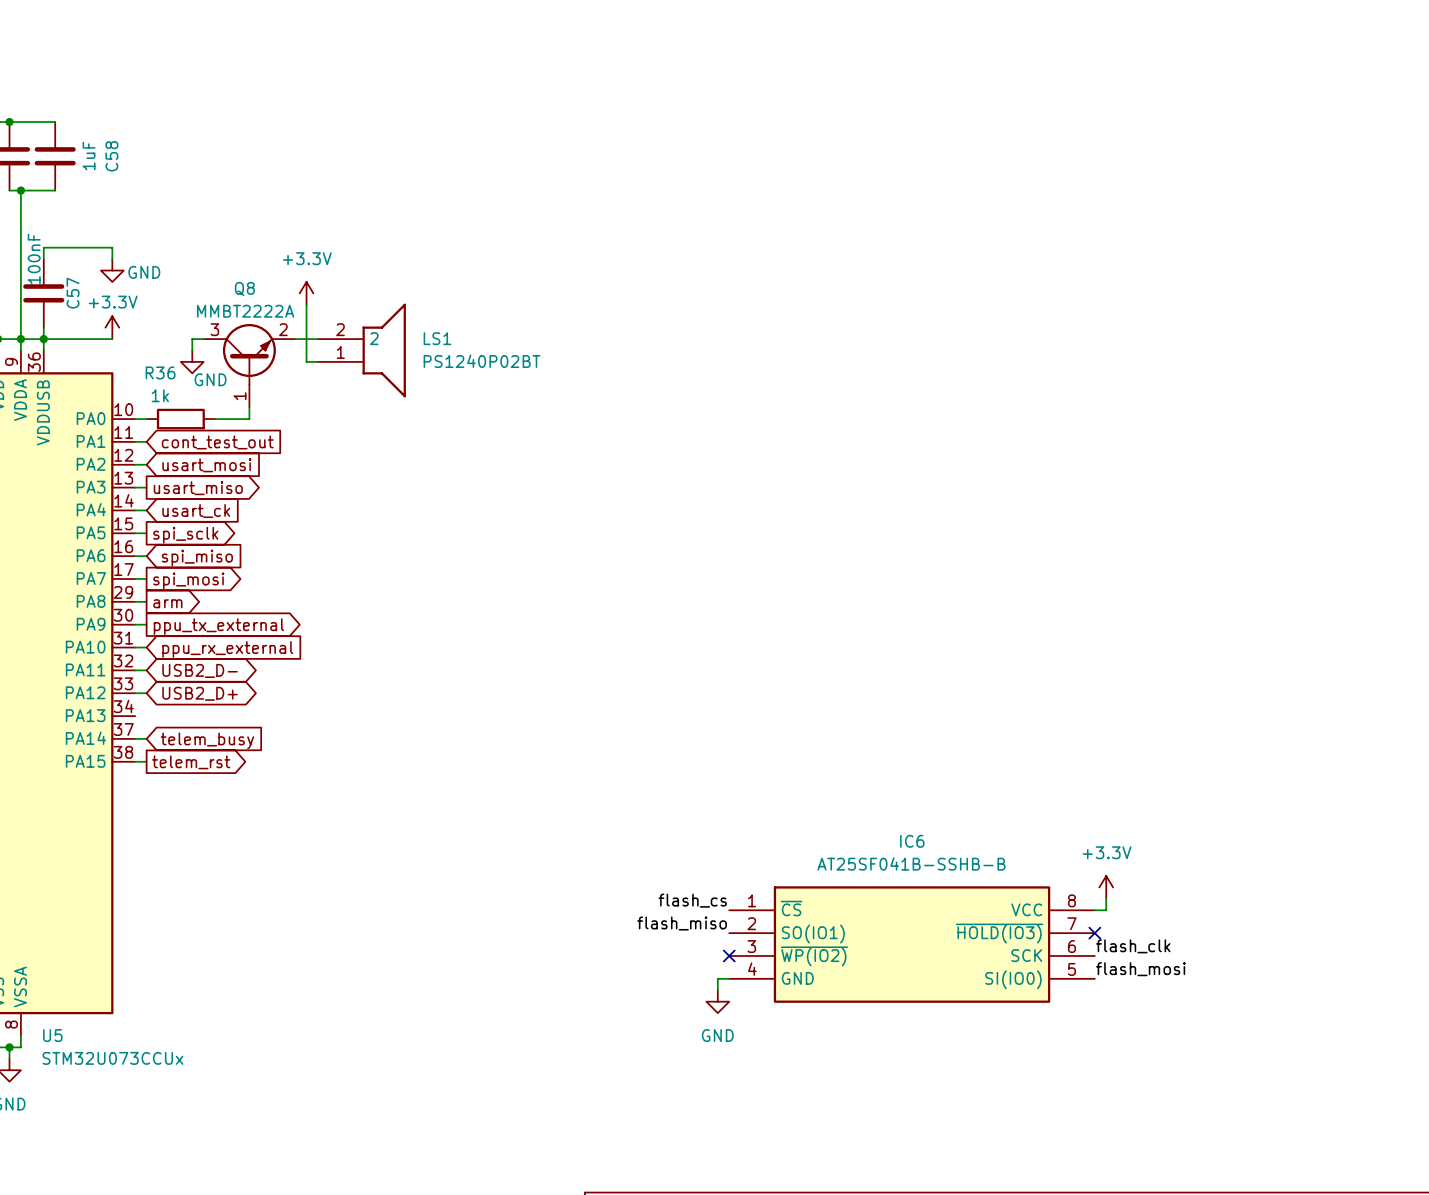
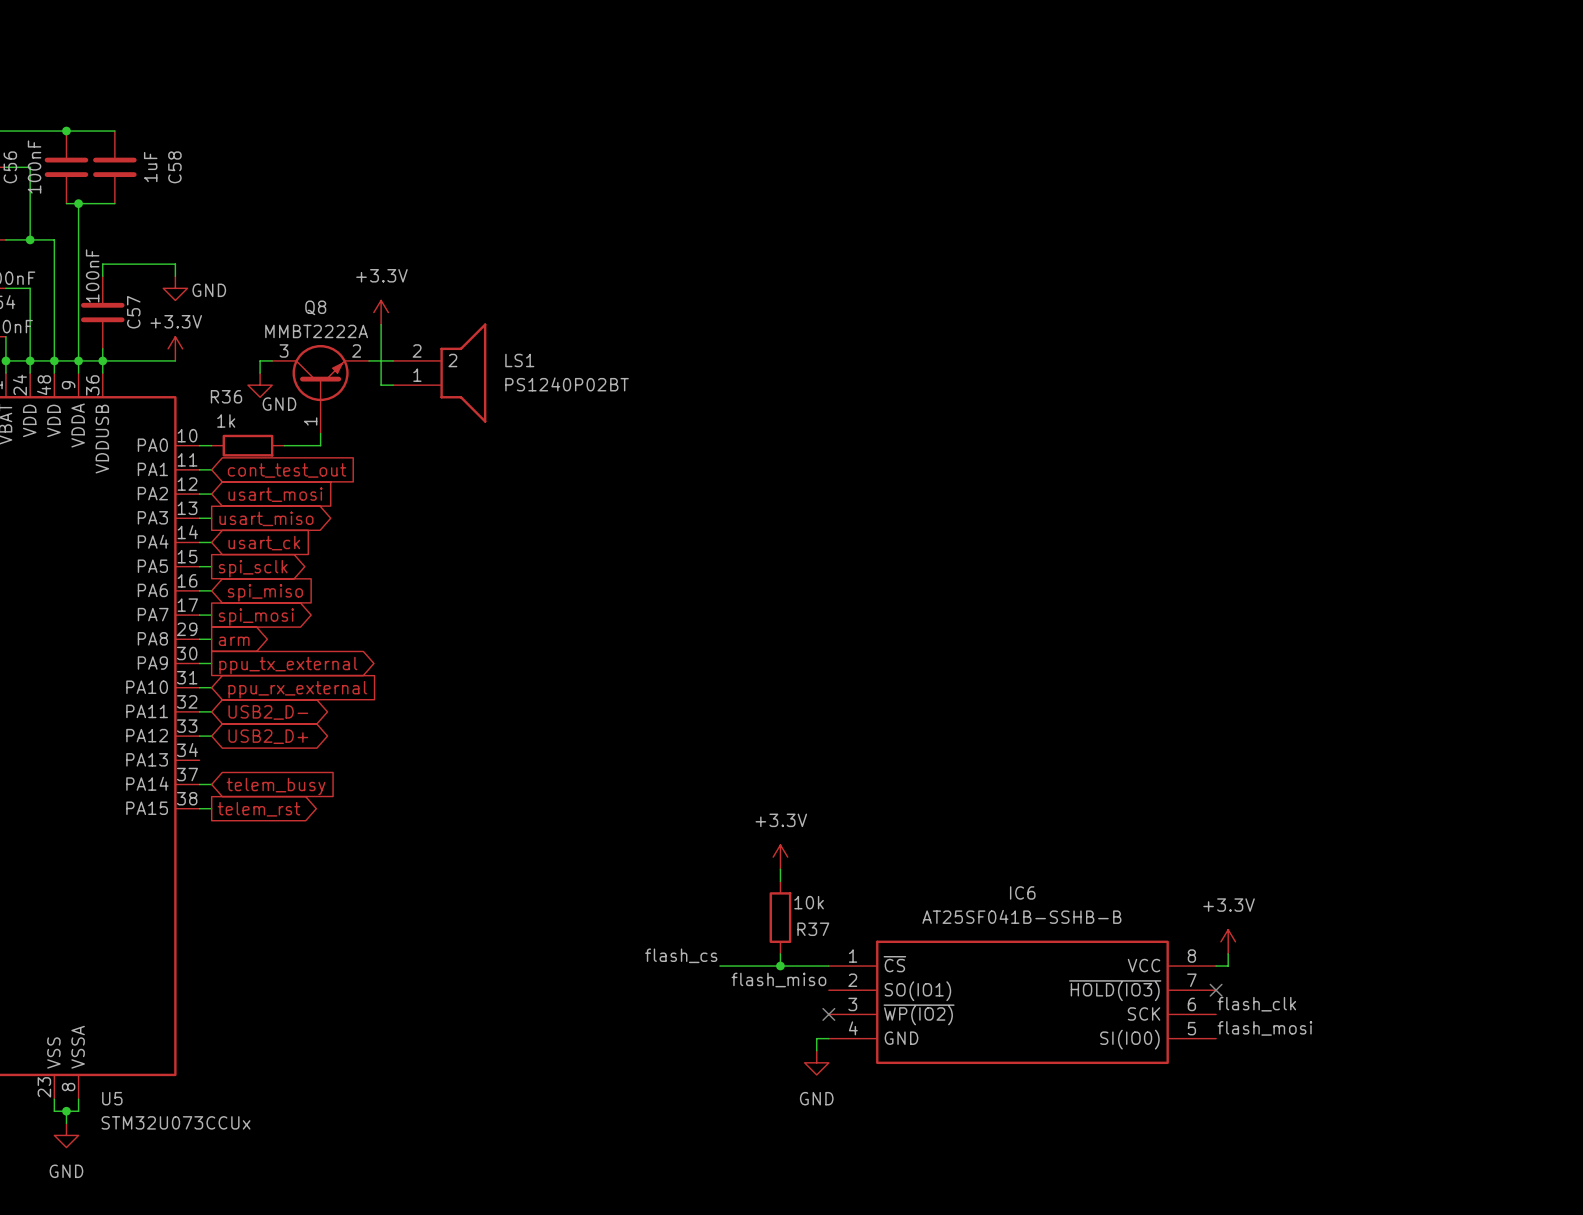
power symbol: none -> +3.3V (780, 857)
wire: none -> (780, 869) (780, 881)
R37: none -> 10k (780, 917)
wire: none -> (780, 953) (780, 966)
label position: flash_cs (692, 900) -> flash_cs (681, 955)
wire: none -> (719, 966) (828, 966)
junction: none -> (780, 966)

